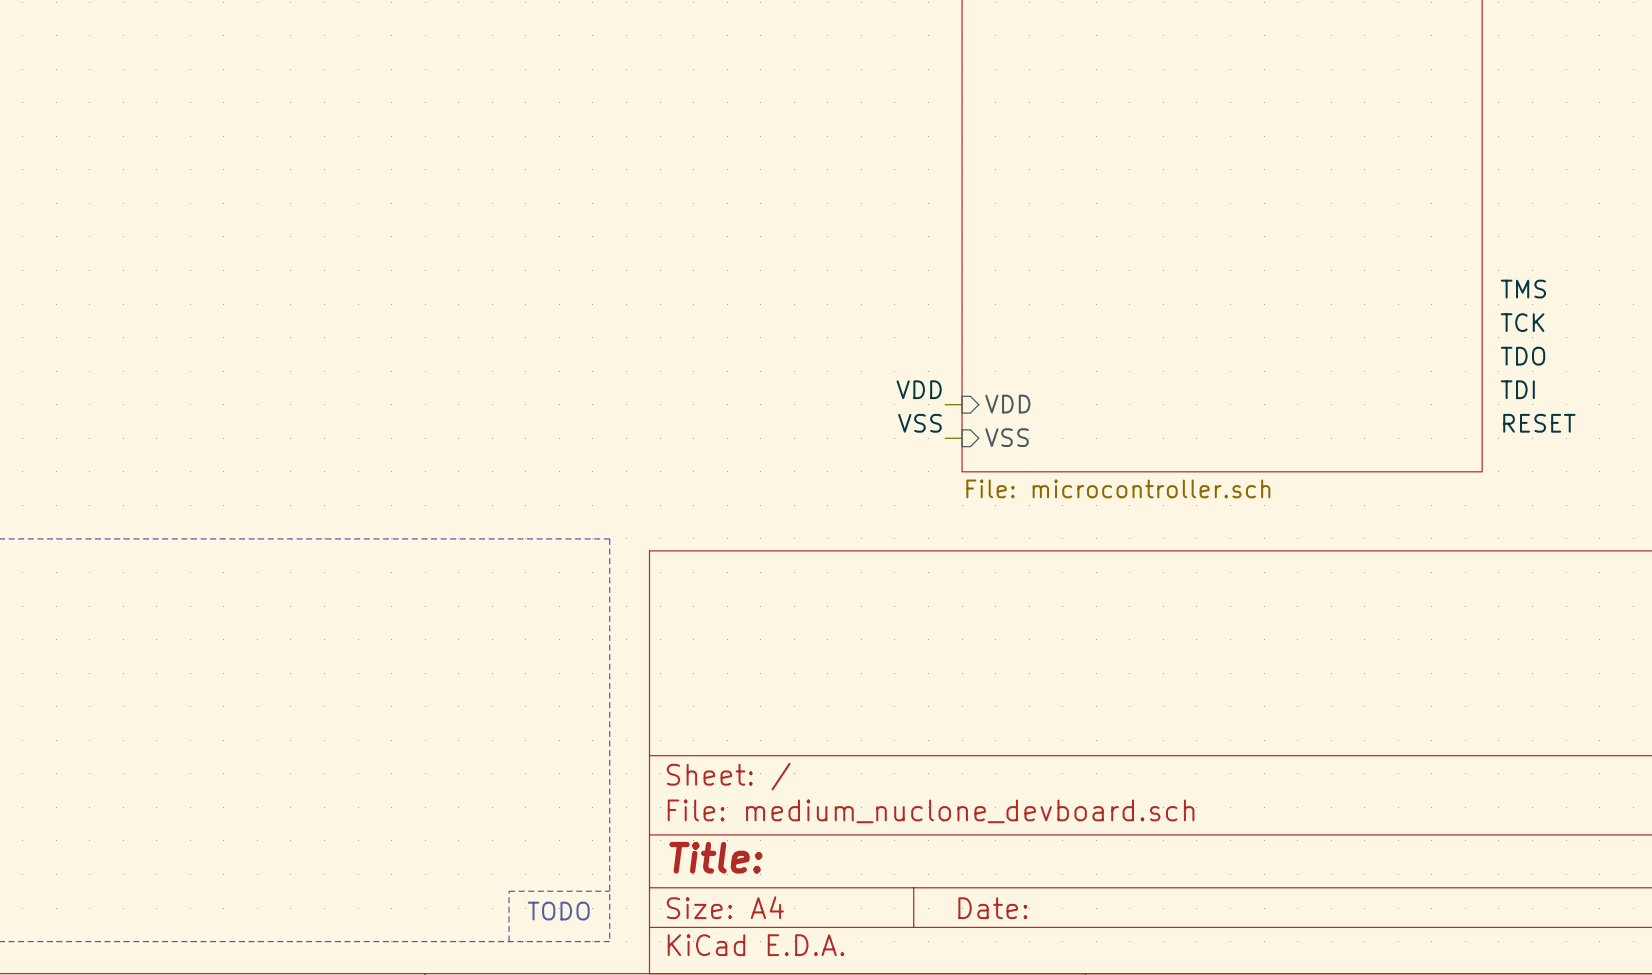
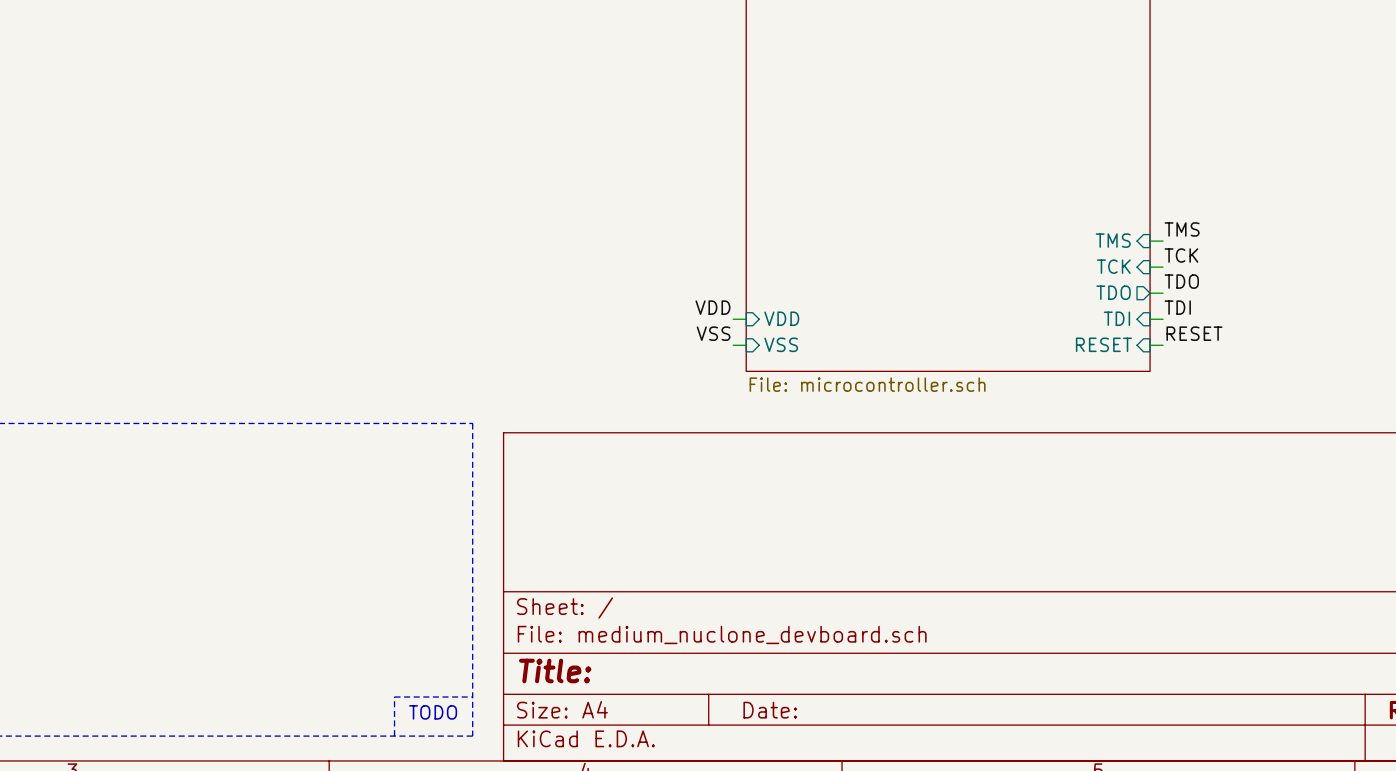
sheet pin: none -> TMS (1113, 240)
wire: none -> (1150, 241) (1163, 241)
sheet pin: none -> TCK (1113, 266)
wire: none -> (1150, 267) (1163, 267)
sheet pin: none -> TDO (1113, 292)
wire: none -> (1150, 293) (1163, 293)
sheet pin: none -> TDI (1116, 318)
wire: none -> (1150, 319) (1163, 319)
sheet pin: none -> RESET (1103, 344)
wire: none -> (1150, 345) (1163, 345)

